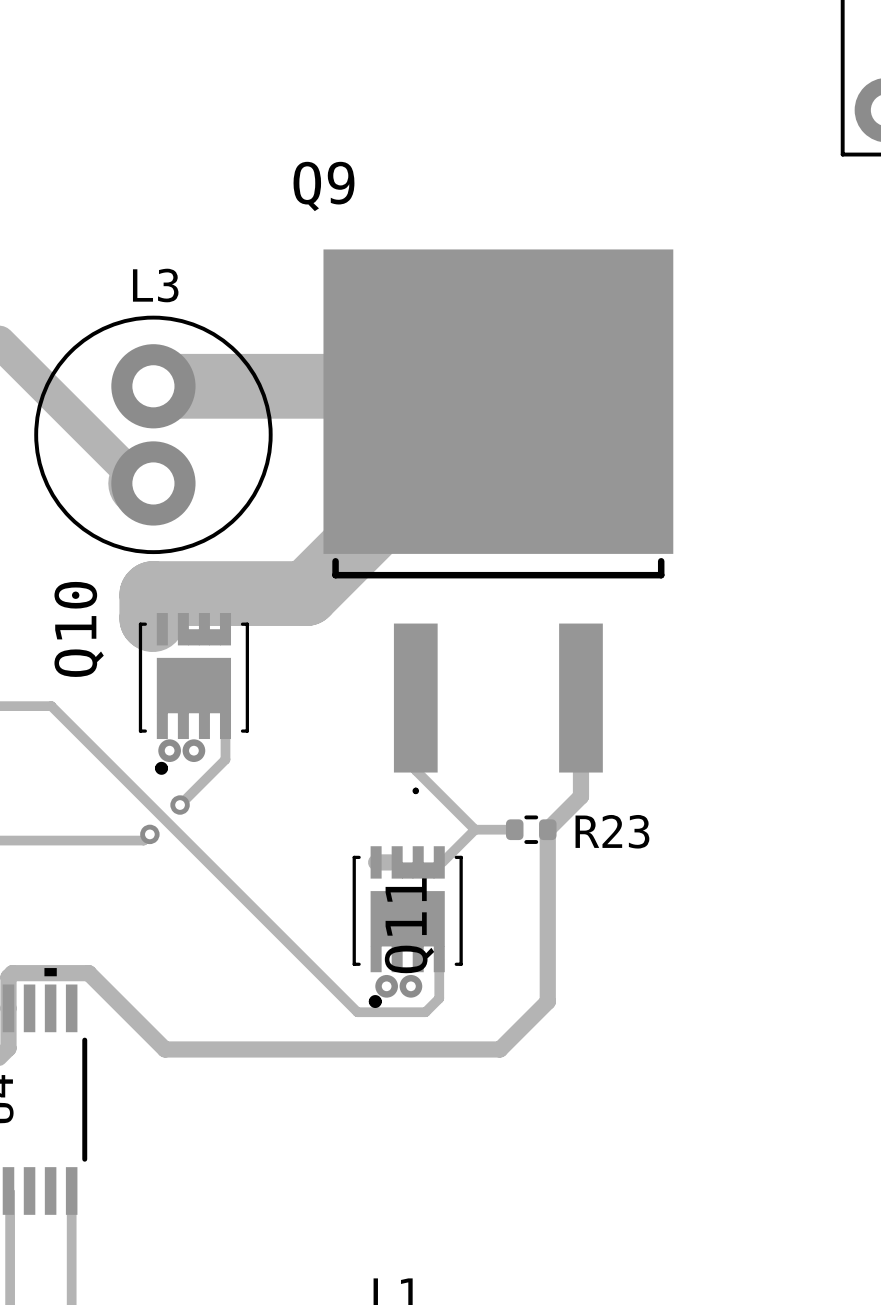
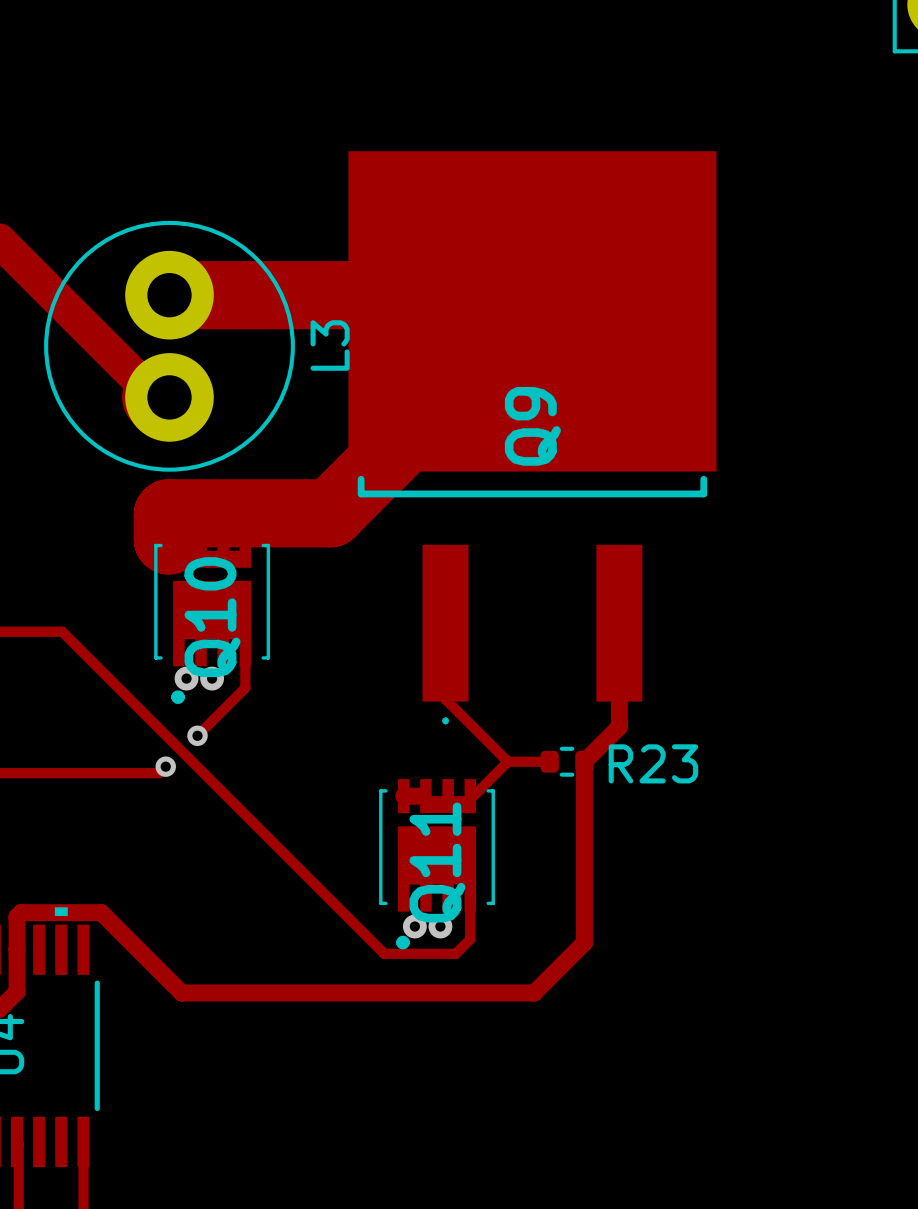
Q9 name rotation: 0° (323, 186) -> 90° counterclockwise (532, 426)
Q9 name position: Q9 (323, 186) -> Q9 (532, 426)
L3 name rotation: 0° (155, 285) -> 90° counterclockwise (330, 345)
L3 name position: L3 (155, 285) -> L3 (330, 345)
Q10 name position: Q10 (79, 629) -> Q10 (212, 617)

